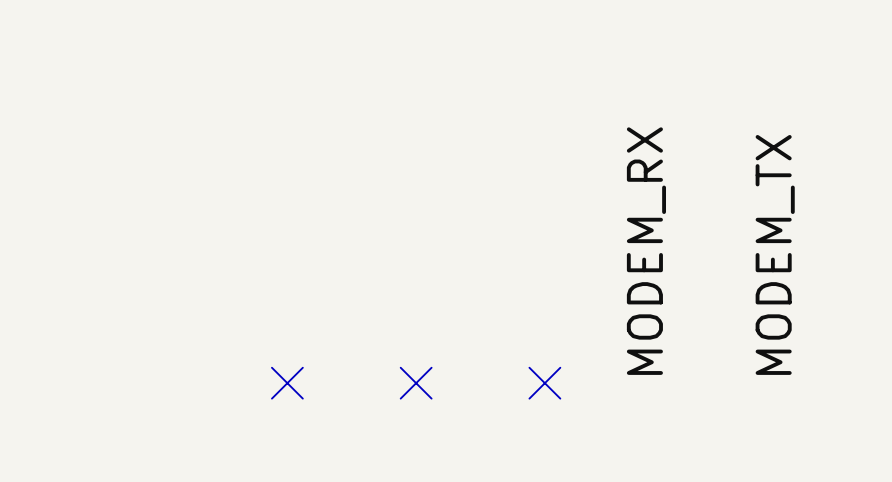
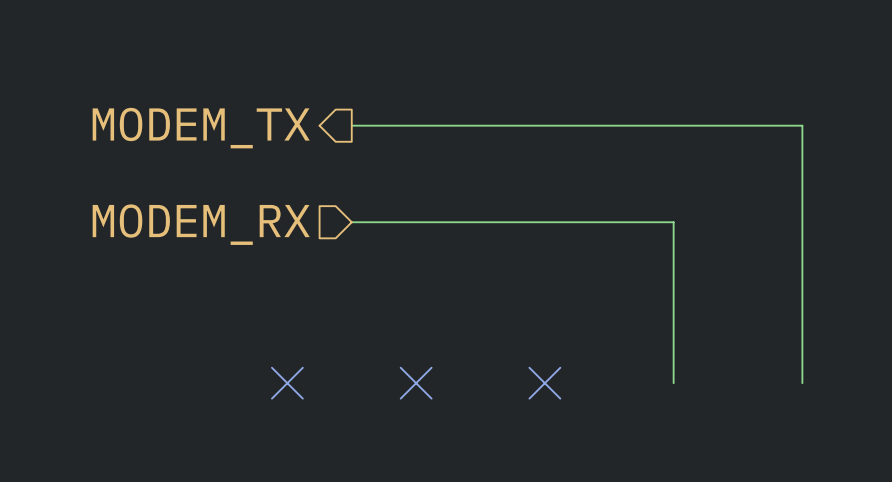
wire: none -> (351, 125) (802, 125) (802, 383)
hierarchical label: none -> MODEM_TX (201, 128)
hierarchical label: none -> MODEM_RX (201, 224)
wire: none -> (351, 222) (673, 222) (673, 383)
label: MODEM_RX (646, 251) -> none
label: MODEM_TX (775, 254) -> none

